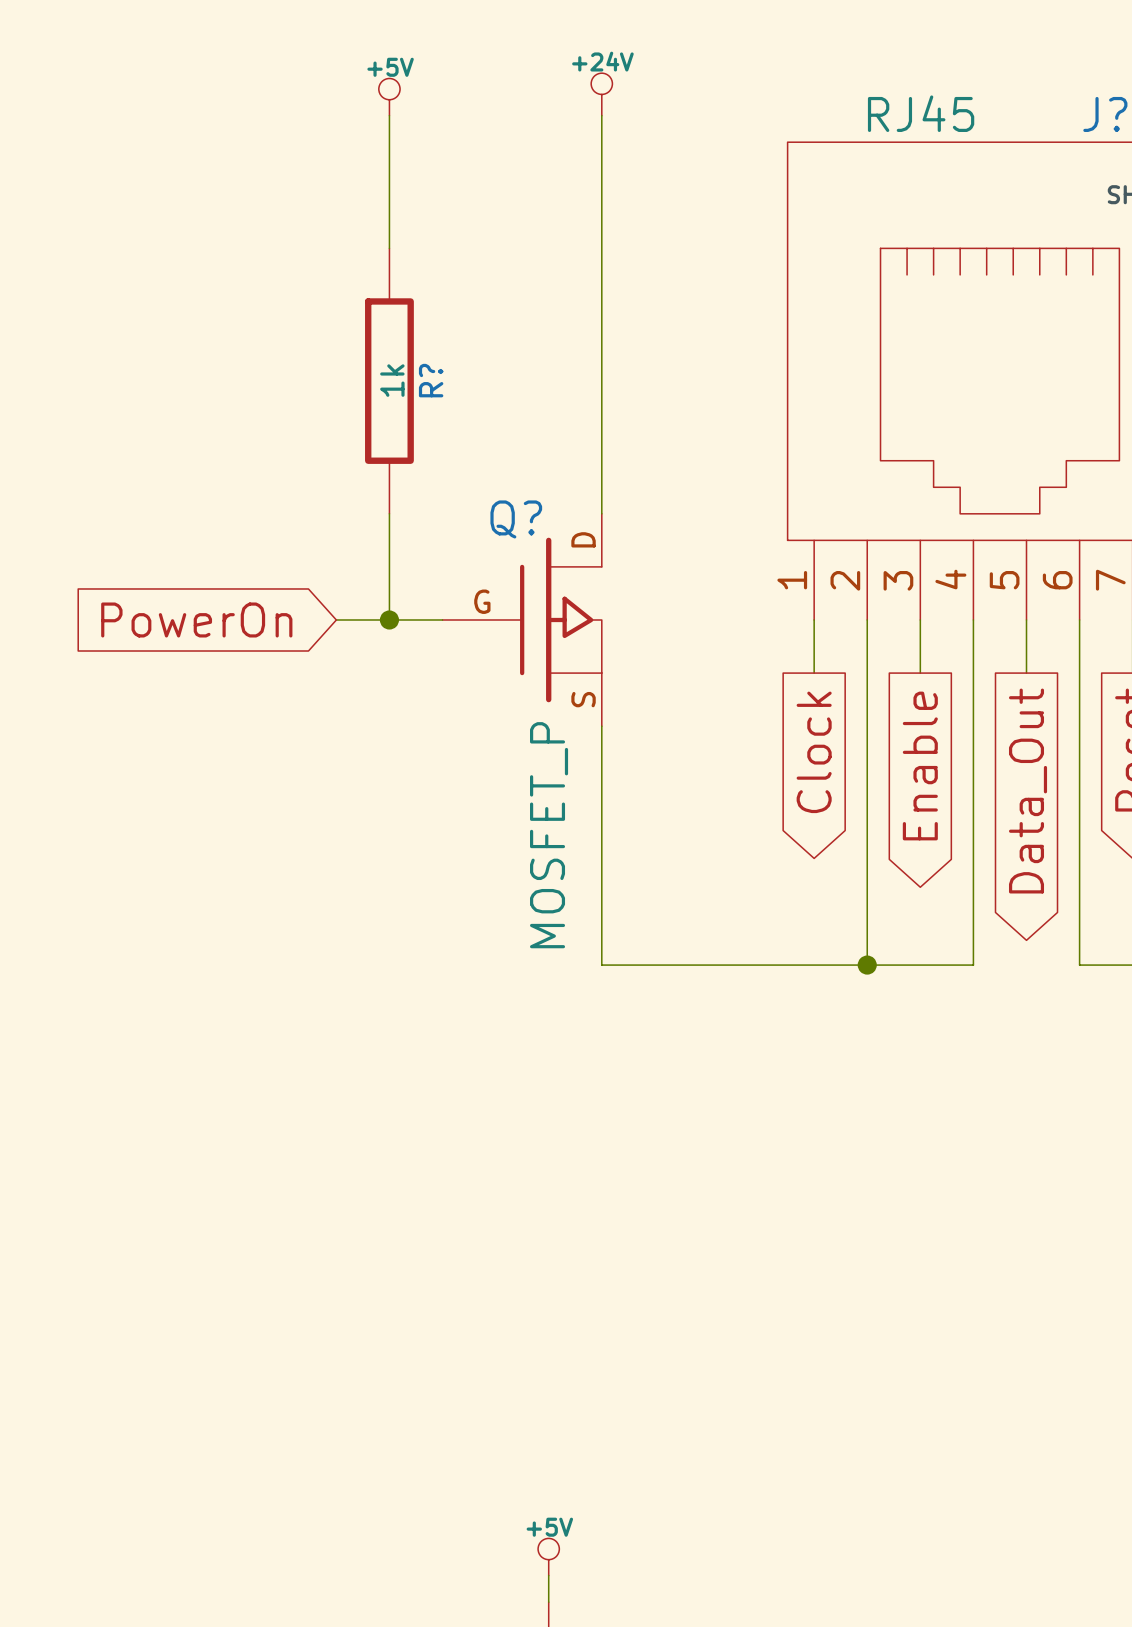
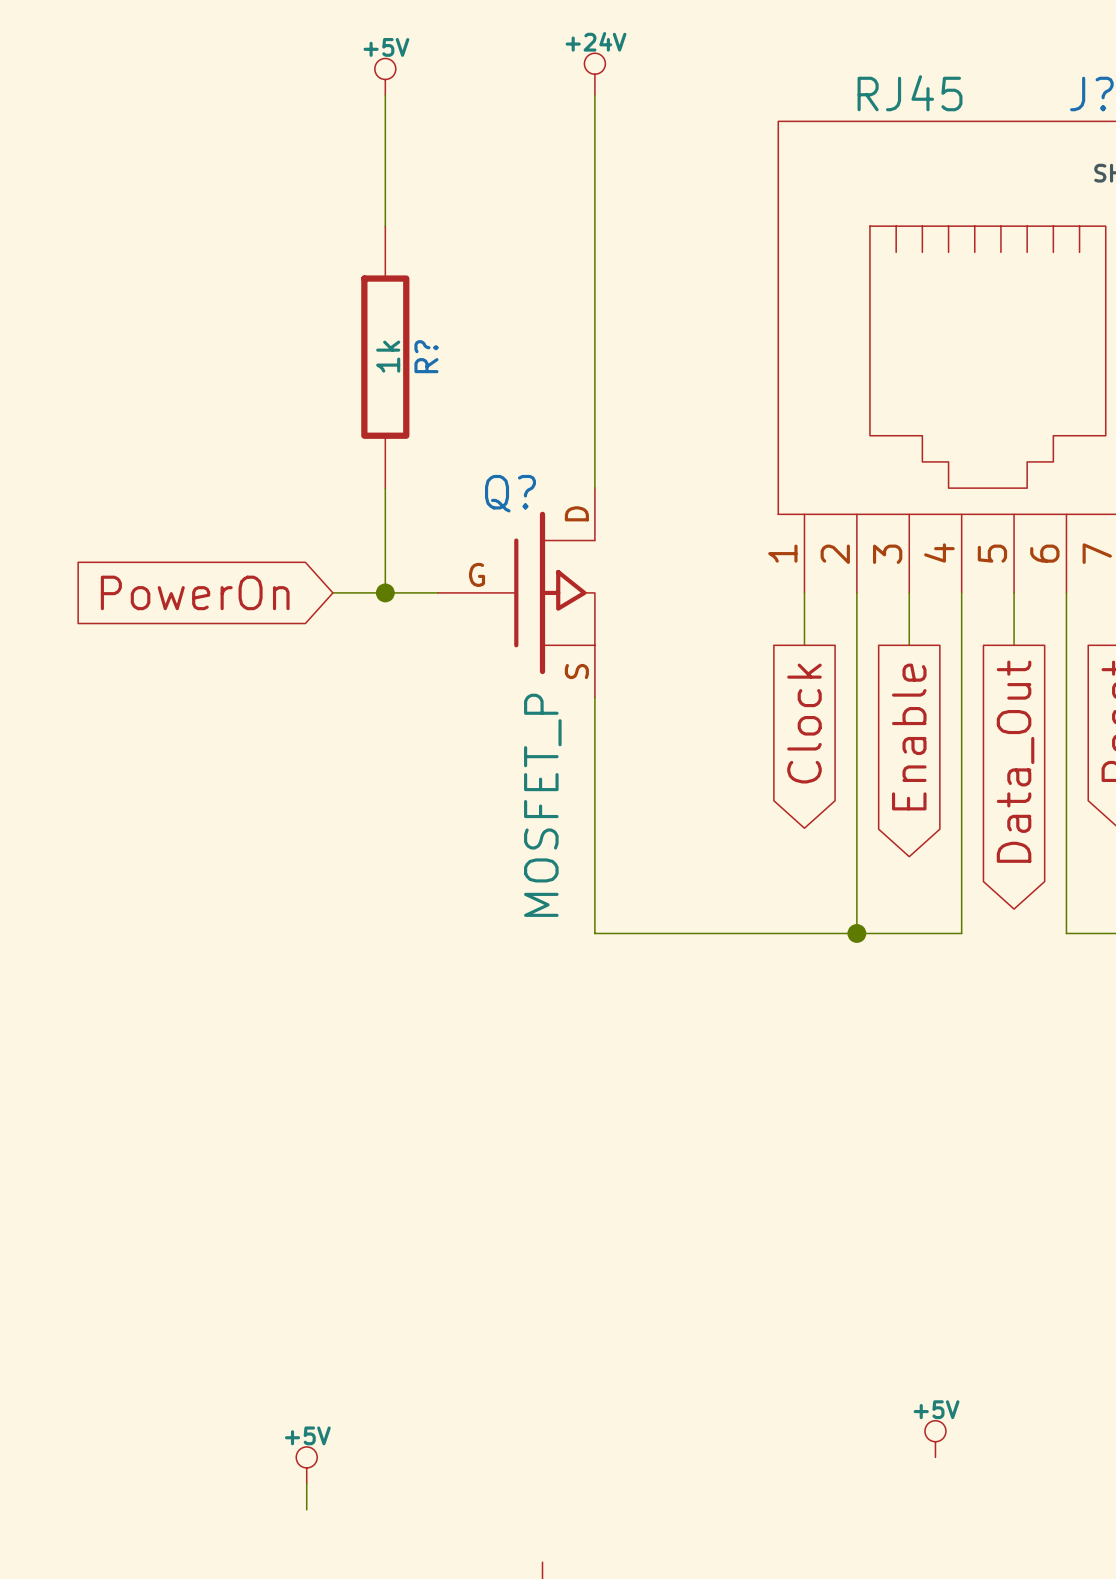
power symbol: none -> +5V (935, 1439)
power symbol: none -> +5V (306, 1465)
power symbol: +5V (548, 1557) -> none
wire: (548, 1575) (548, 1602) -> (306, 1483) (306, 1509)

